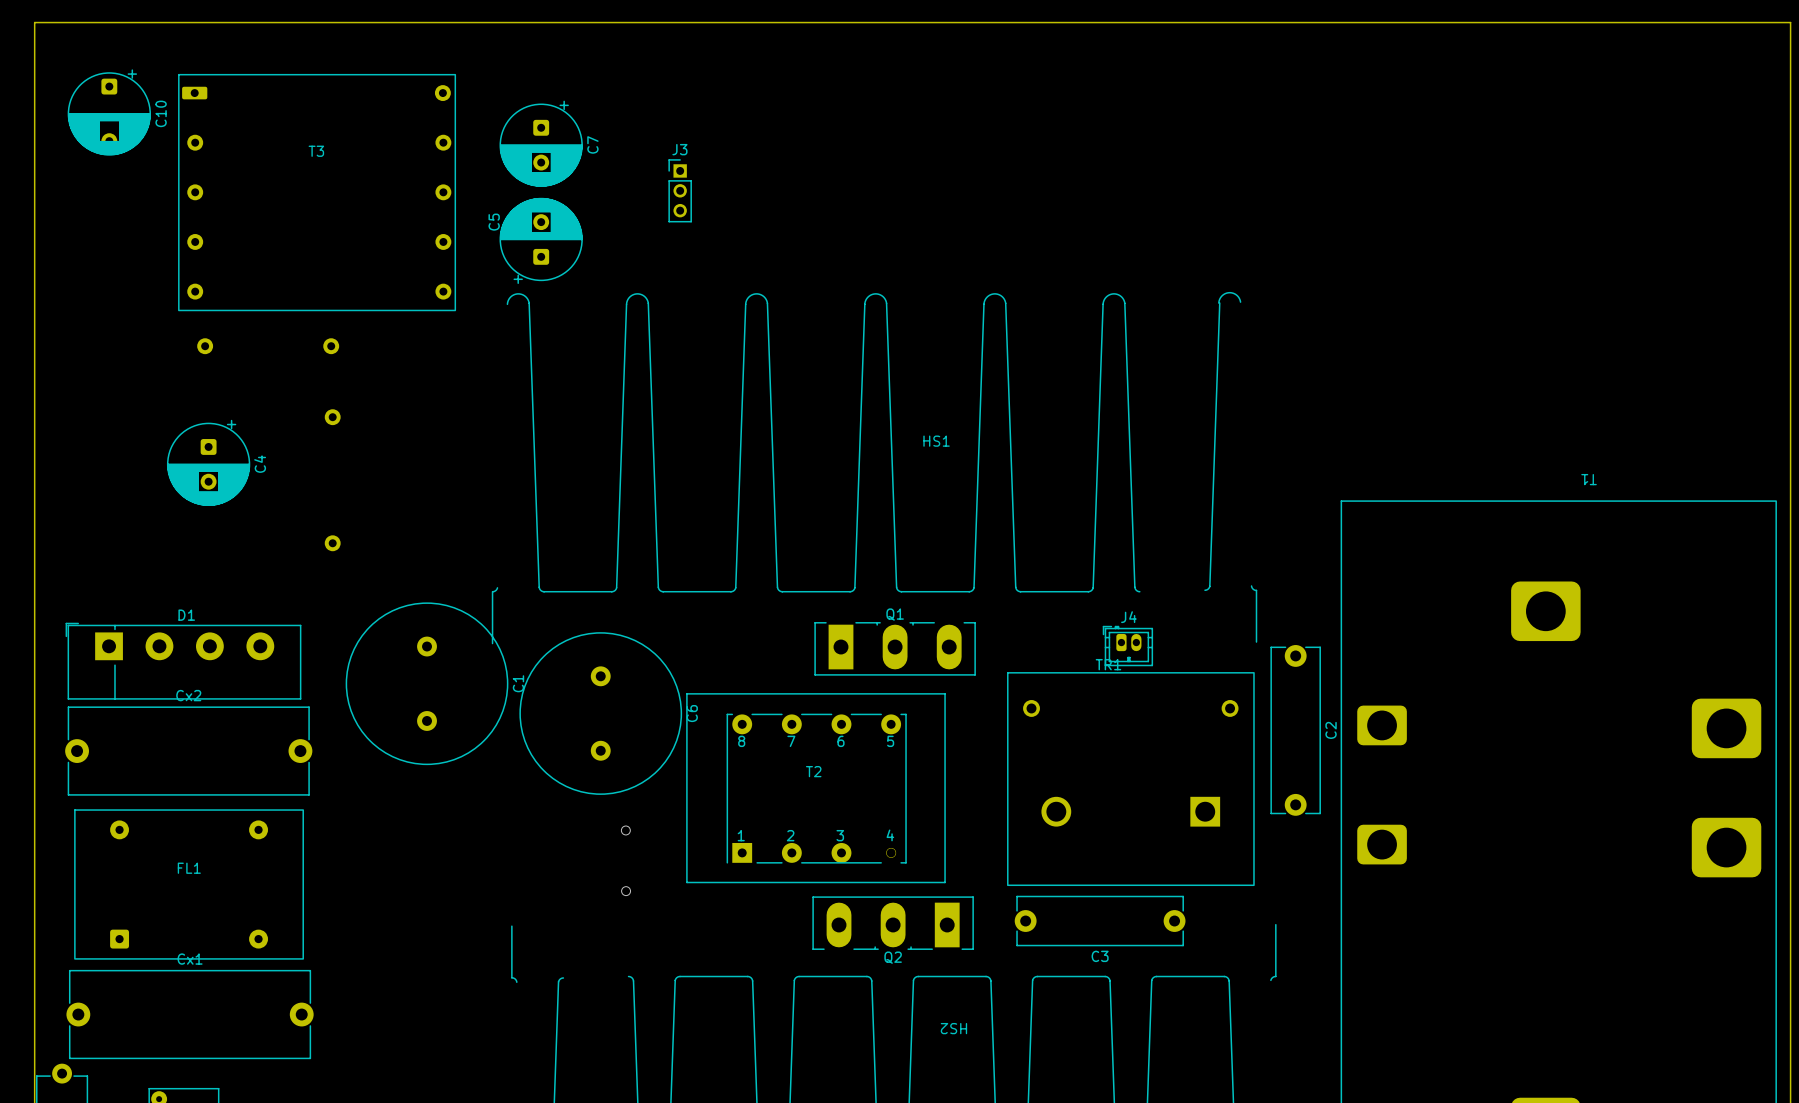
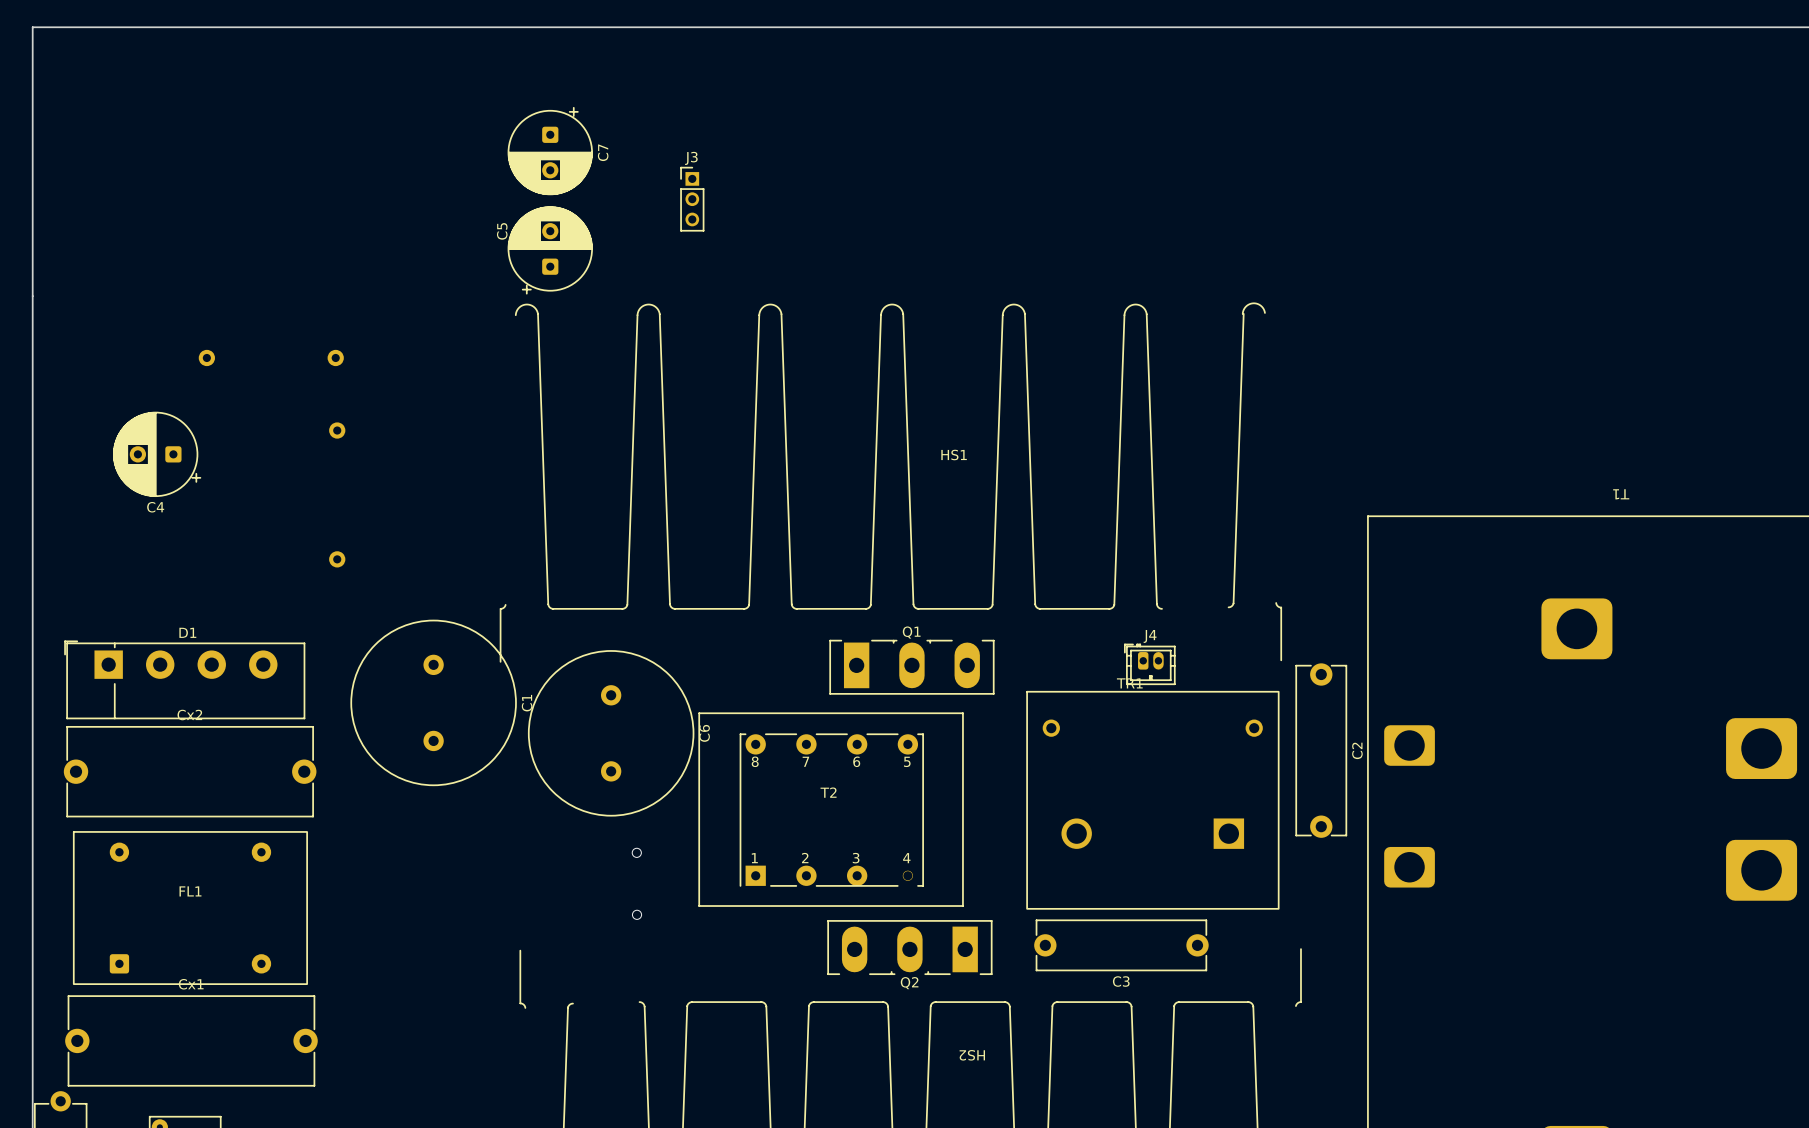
C10: (109, 112) -> none
T3: (317, 192) -> none
C4 rotation: 0° (208, 462) -> 90° clockwise (157, 454)
C4 position: (208, 462) -> (157, 454)

